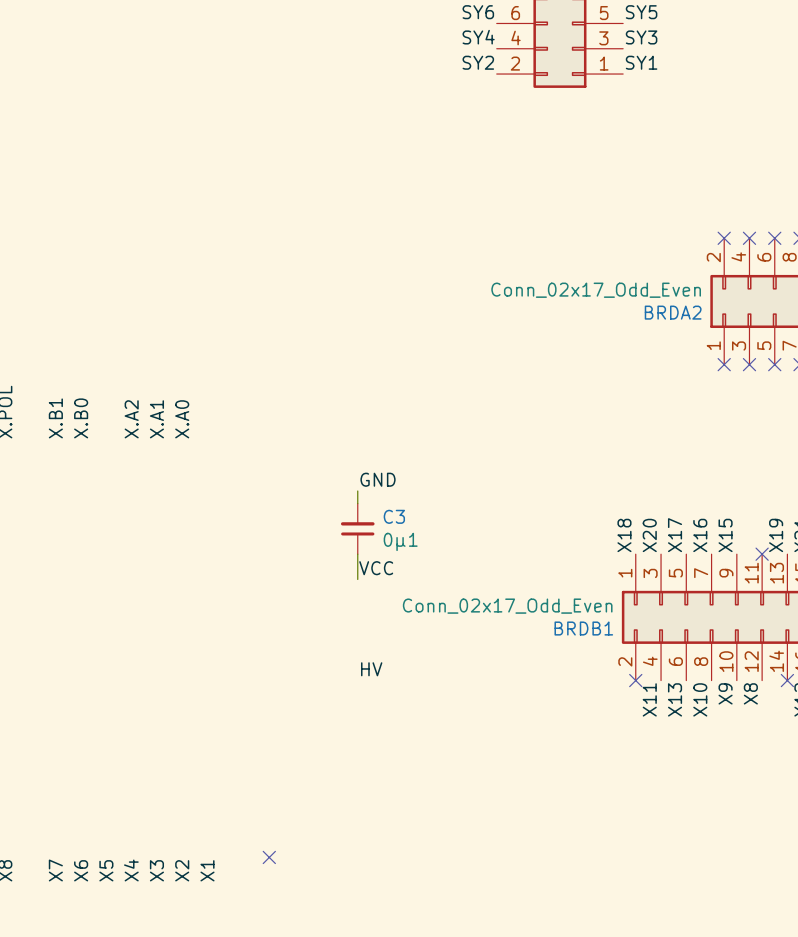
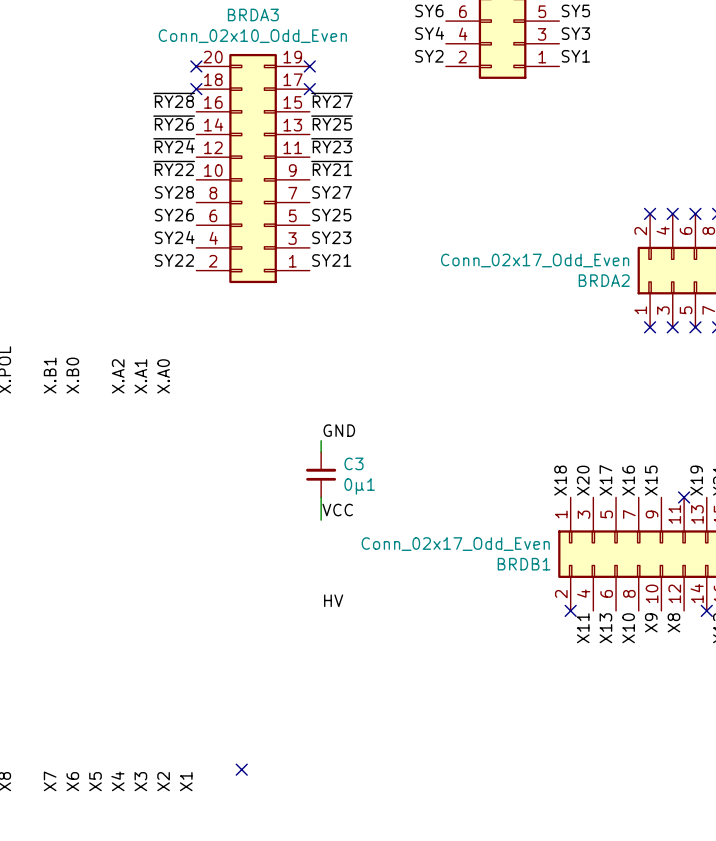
no-connect mark: none -> (196, 66)
no-connect mark: none -> (309, 66)
no-connect mark: none -> (196, 89)
no-connect mark: none -> (309, 89)
label: none -> ~{RY28} (174, 100)
label: none -> ~{RY27} (332, 100)
label: none -> ~{RY26} (174, 123)
label: none -> ~{RY25} (332, 123)
label: none -> ~{RY24} (174, 145)
label: none -> ~{RY23} (332, 145)
label: none -> ~{RY22} (174, 168)
BRDA3: none -> Conn_02x10_Odd_Even (253, 168)
label: none -> ~{RY21} (332, 168)
label: none -> SY28 (174, 192)
label: none -> SY27 (332, 192)
label: none -> SY26 (174, 215)
label: none -> SY25 (331, 215)
label: none -> SY24 (174, 237)
label: none -> SY23 (331, 237)
label: none -> SY22 (174, 260)
label: none -> SY21 (331, 260)

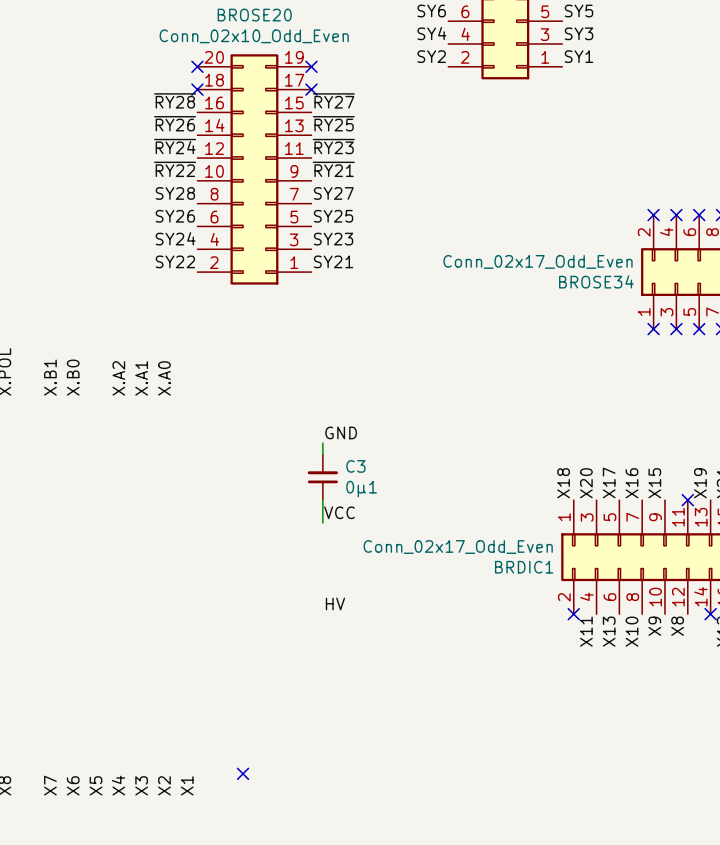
BRDA3 name: BRDA3 (253, 14) -> BROSE20 (254, 15)
BRDA2 name: BRDA2 (604, 280) -> BROSE34 (596, 281)
BRDB1 name: BRDB1 (524, 564) -> BRDIC1 (524, 567)

